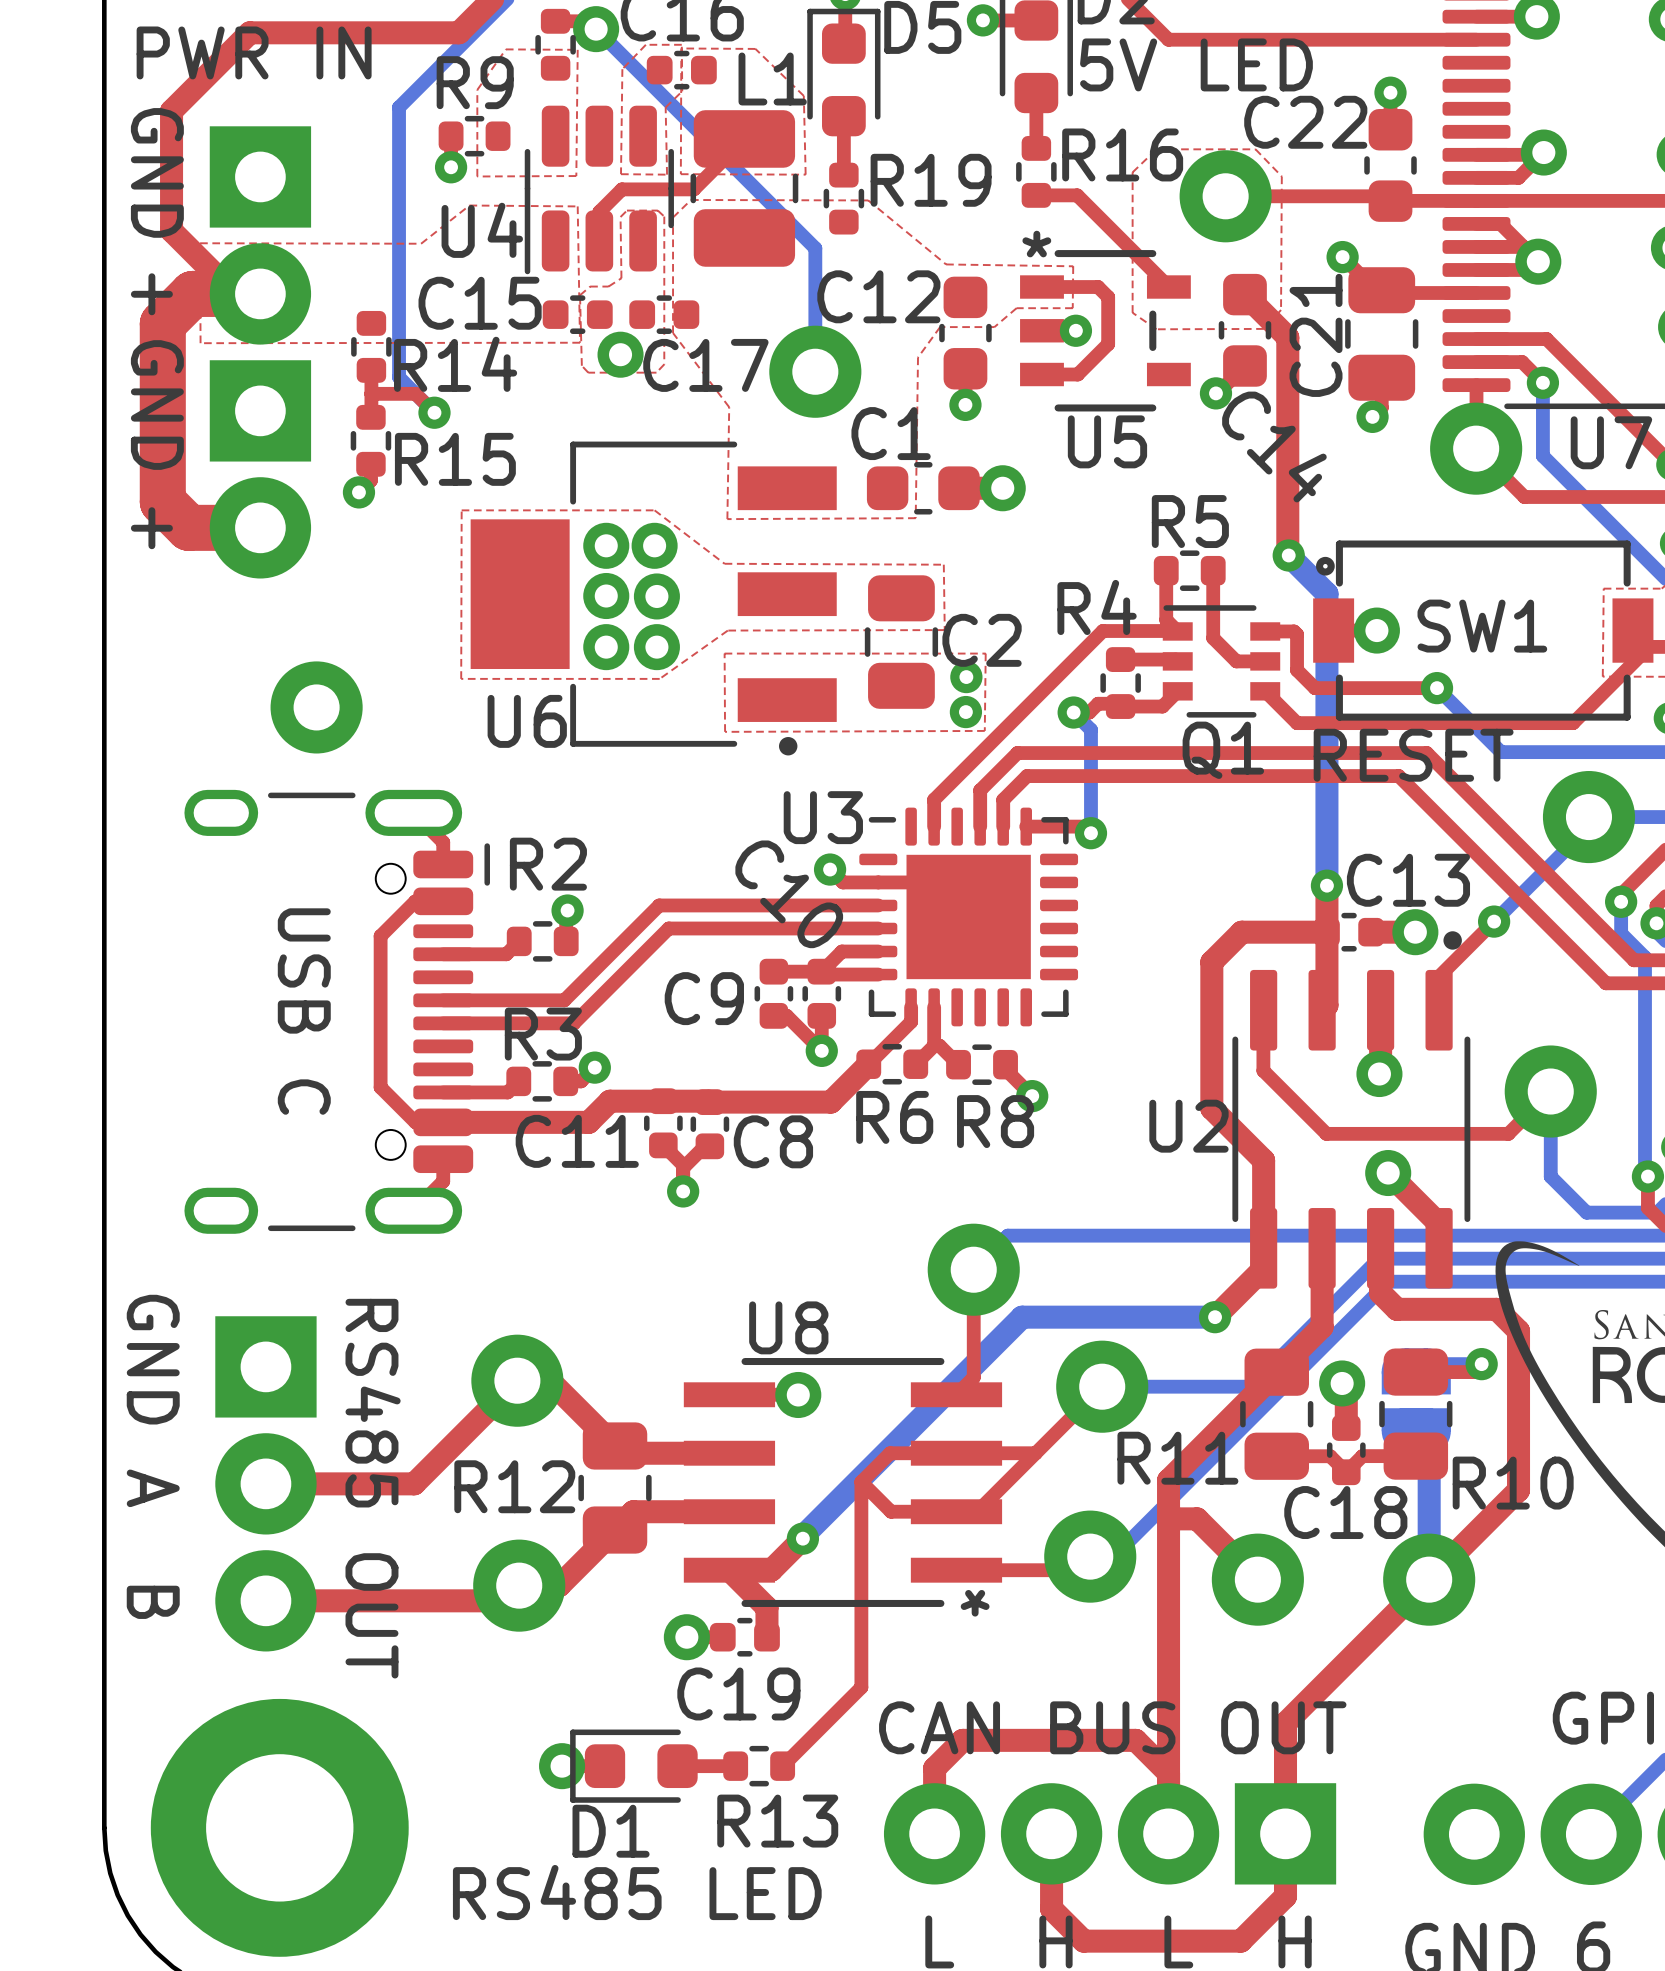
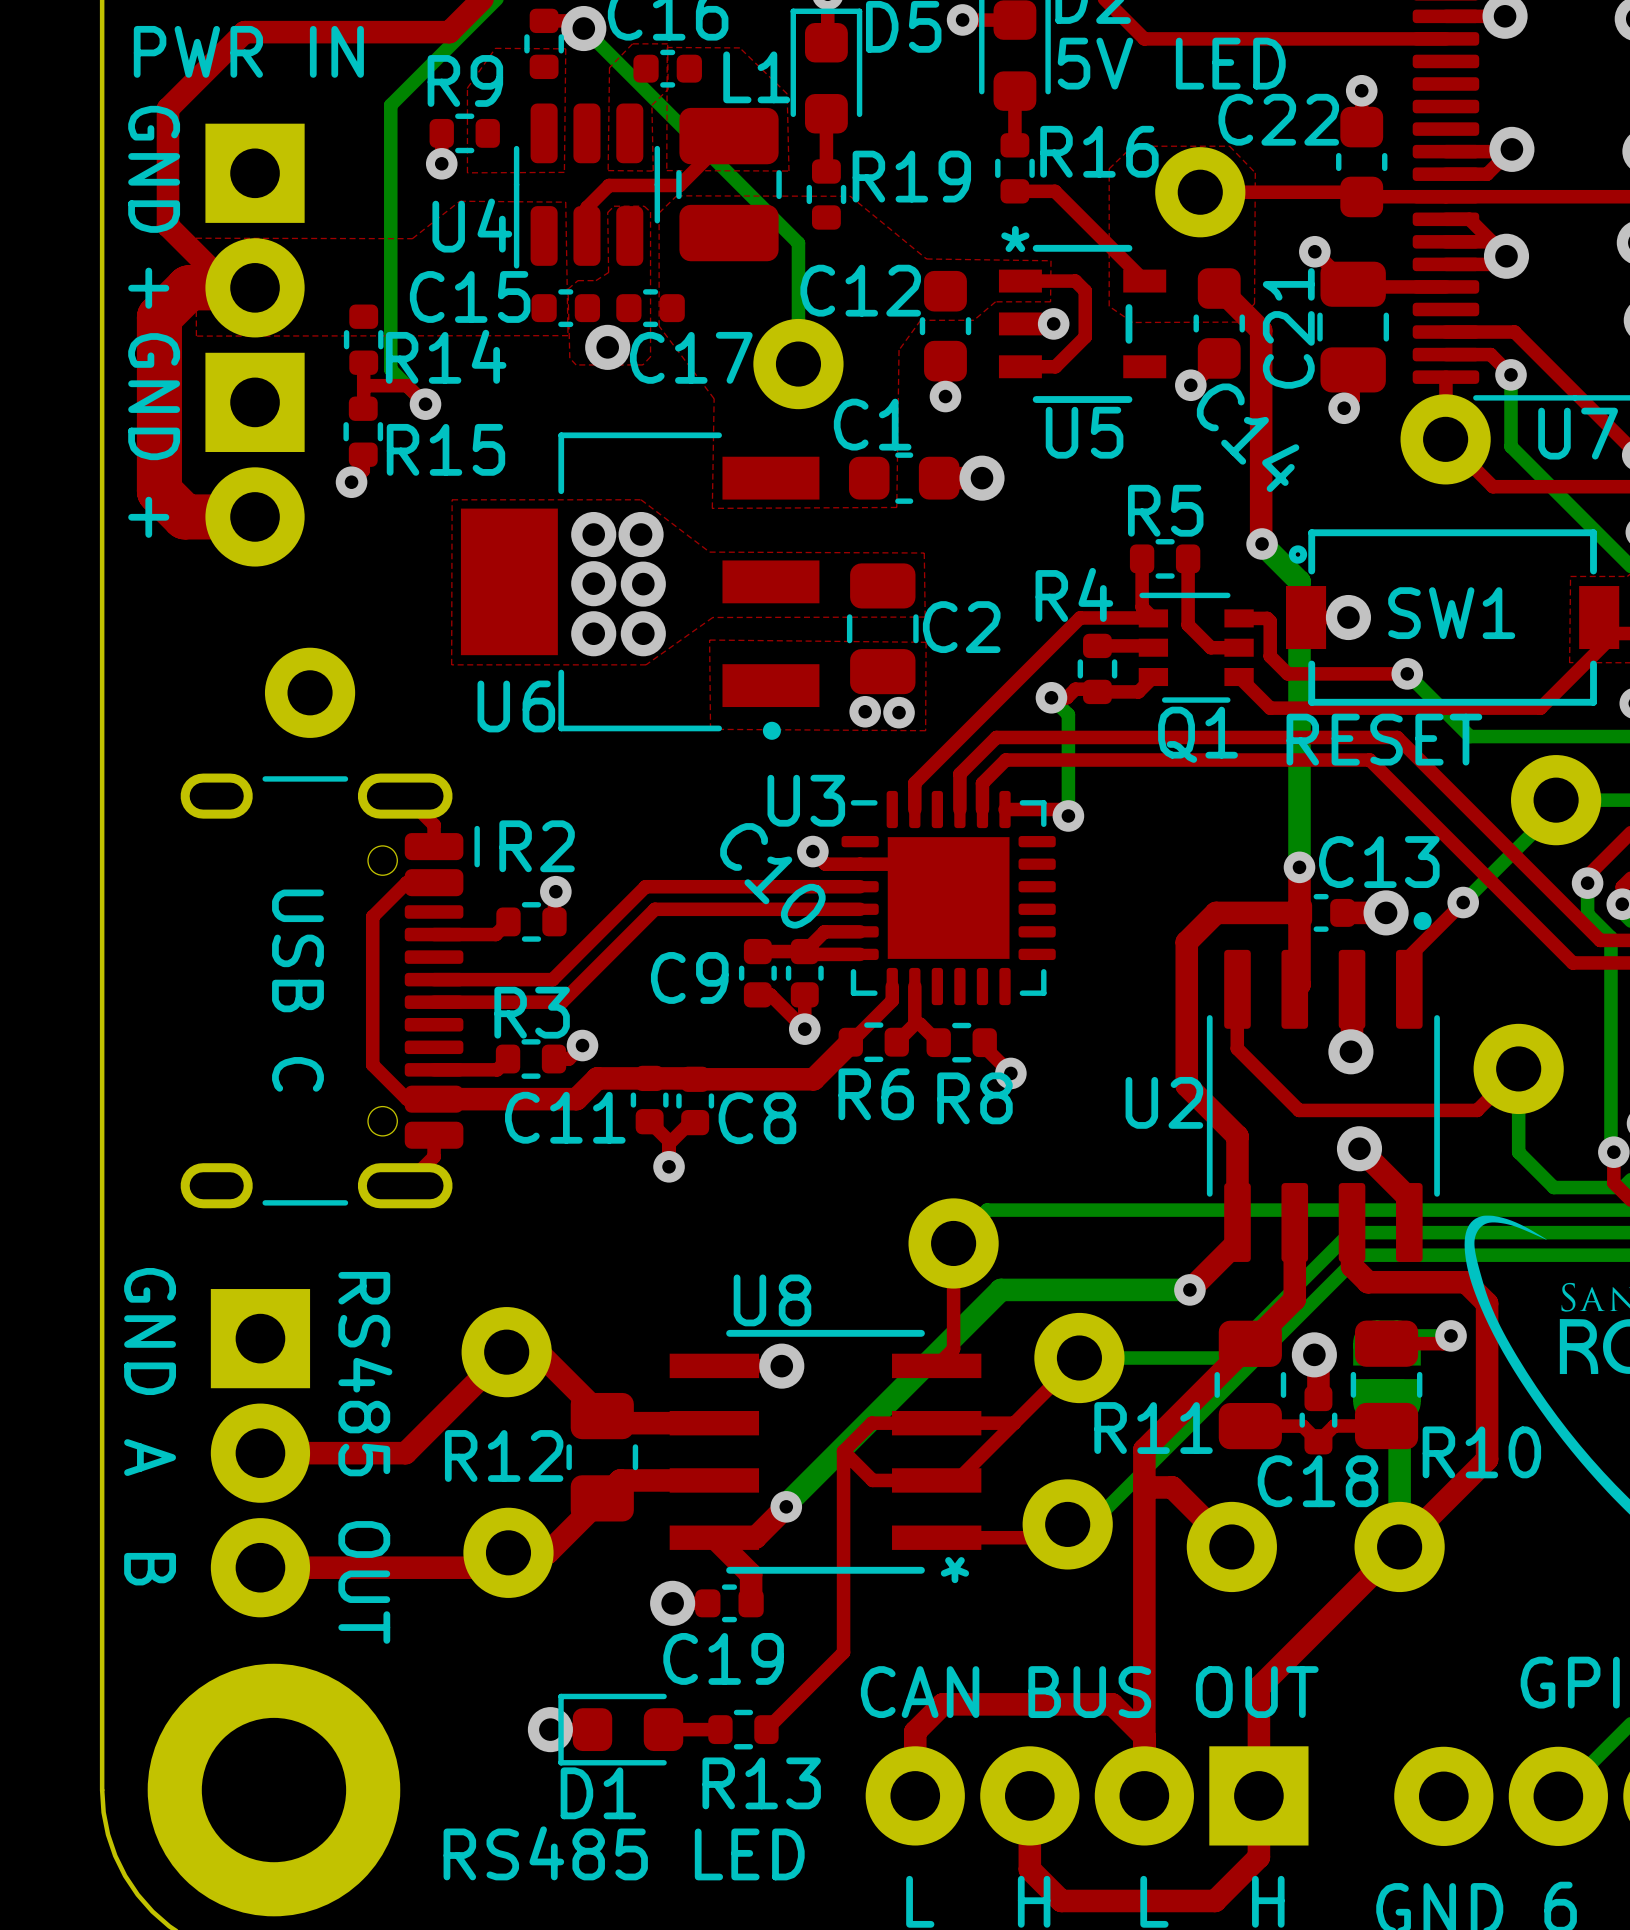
top zone outline: (724, 653) (985, 653) (984, 730) (725, 731) (724, 653) -> (709, 640) (710, 729) (925, 730) (926, 642) (709, 640)
via: (966, 677) -> none
via: (965, 712) -> none
via: none -> (865, 711)
via: none -> (899, 712)

